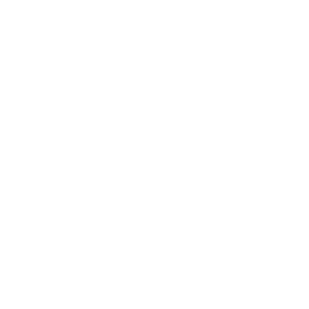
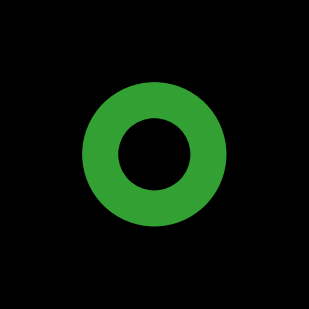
part: none -> (154, 154)

